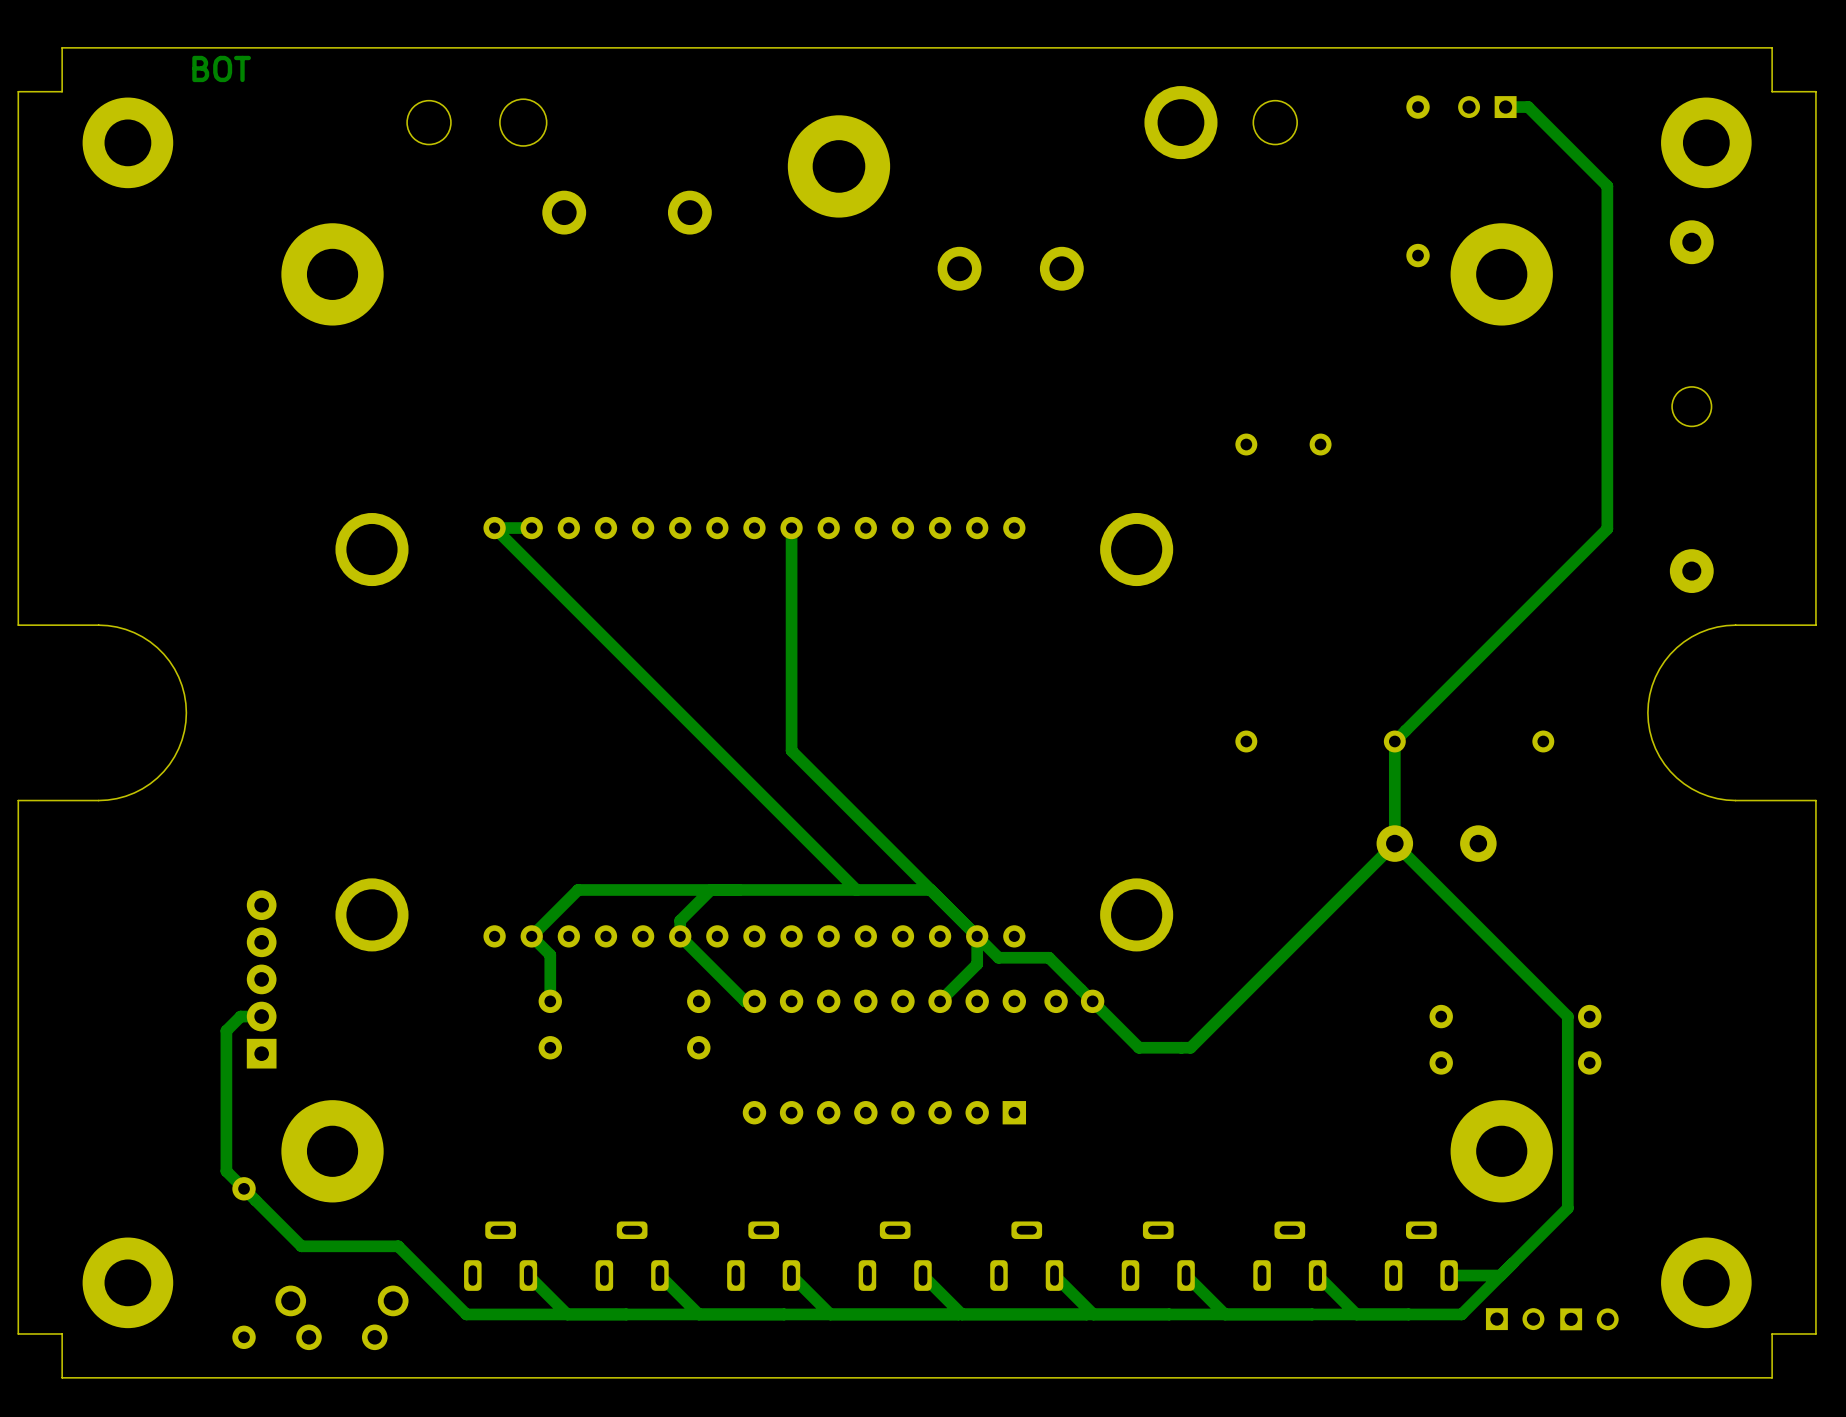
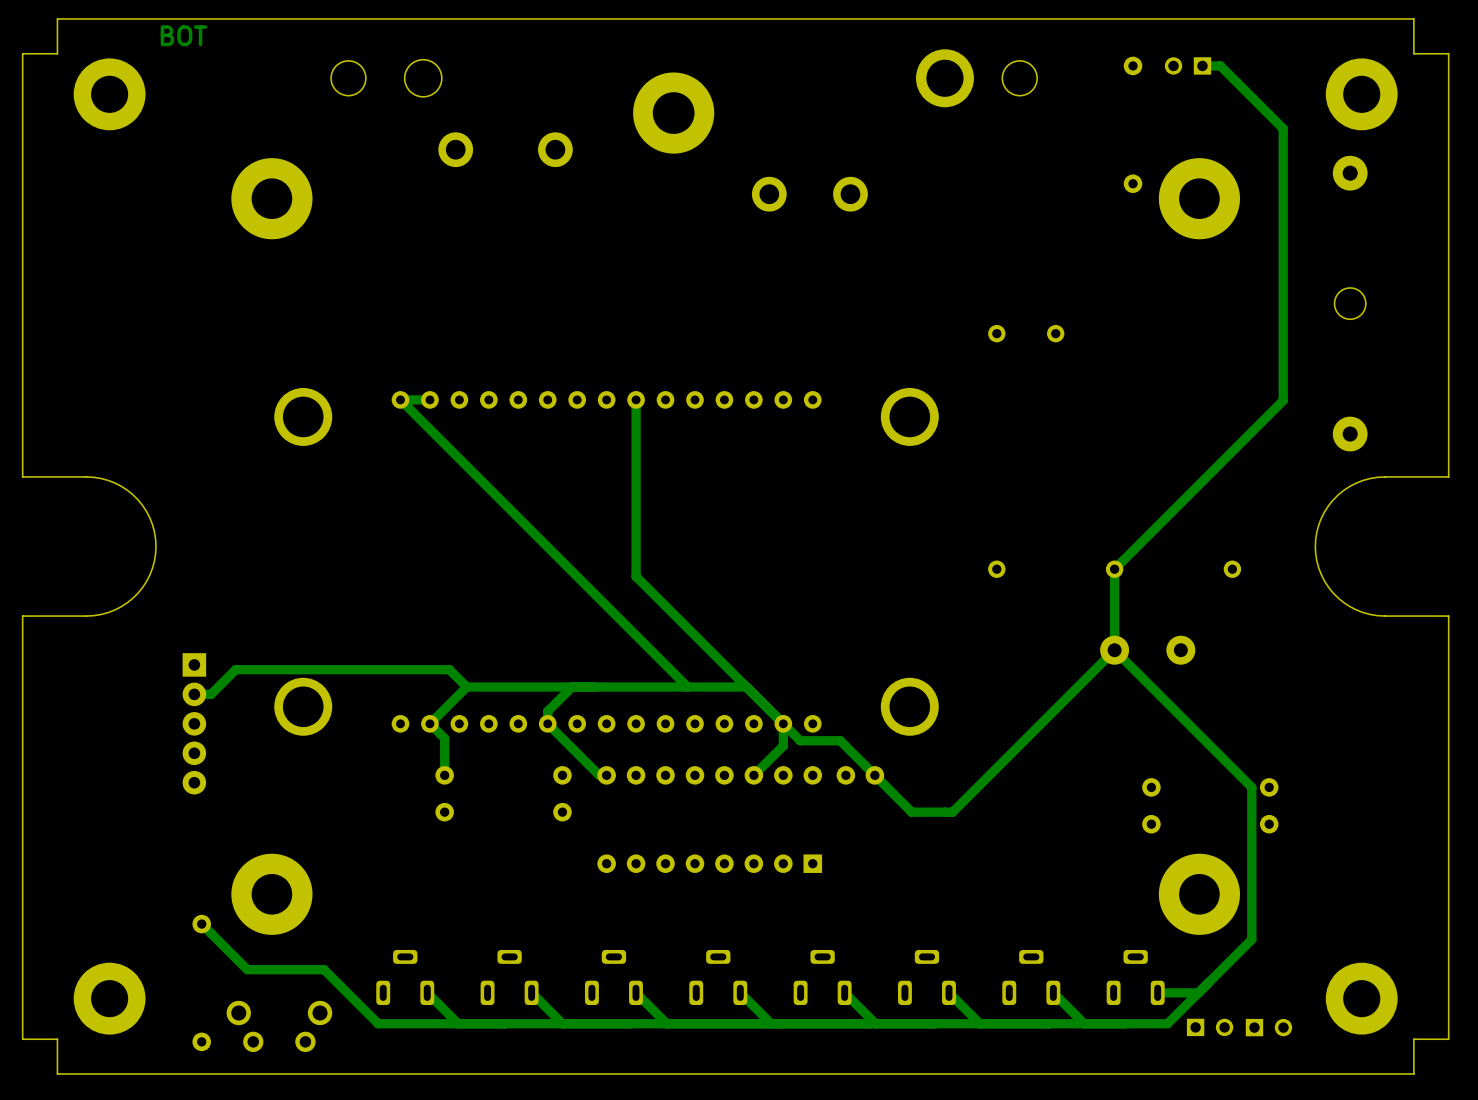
track: none -> (466, 687) (449, 669) (235, 669) (211, 694) (194, 694)
part rotation: 0° (261, 979) -> 180° (194, 723)
track: (261, 1016) (240, 1016) (226, 1030) (226, 1171) (244, 1188) -> none

